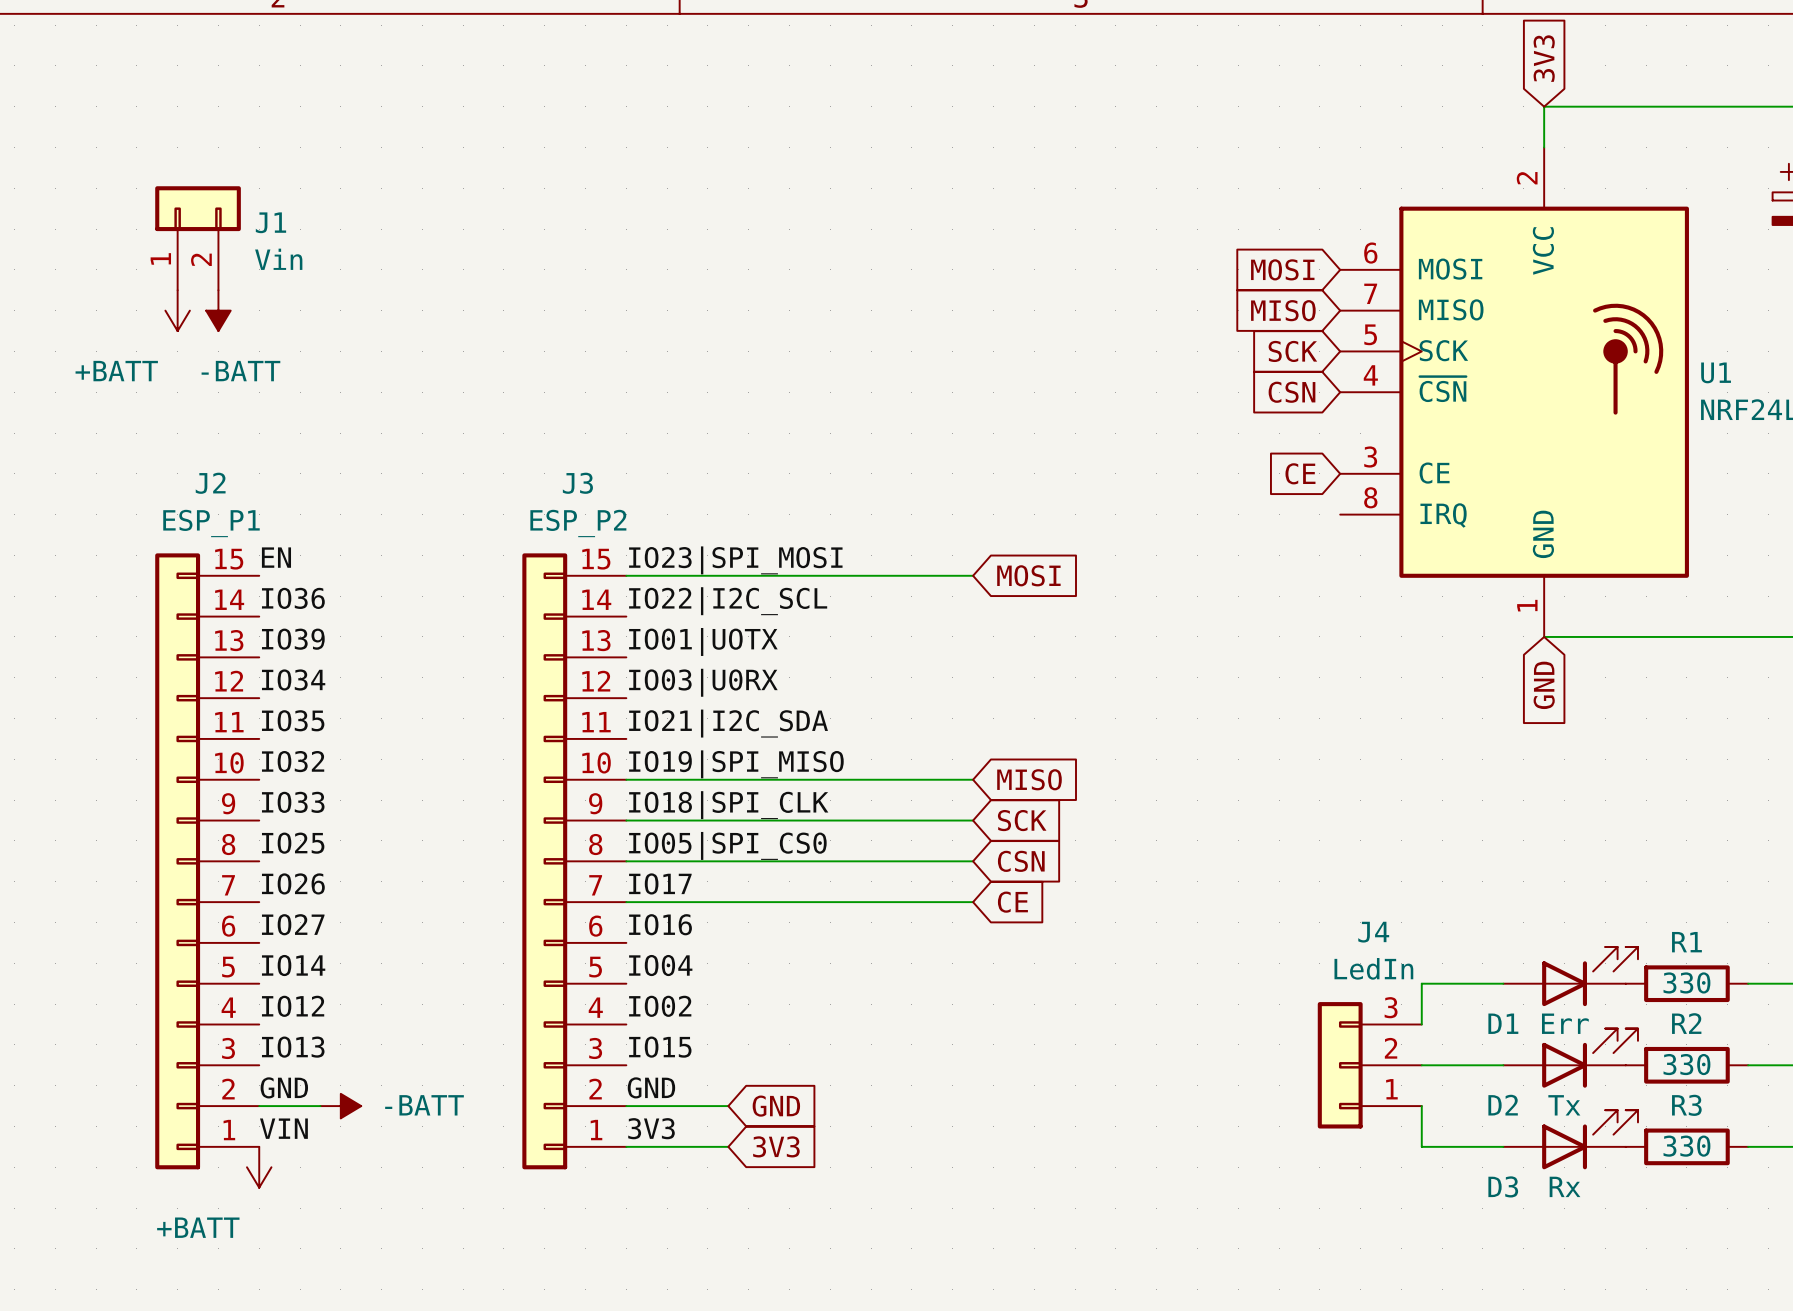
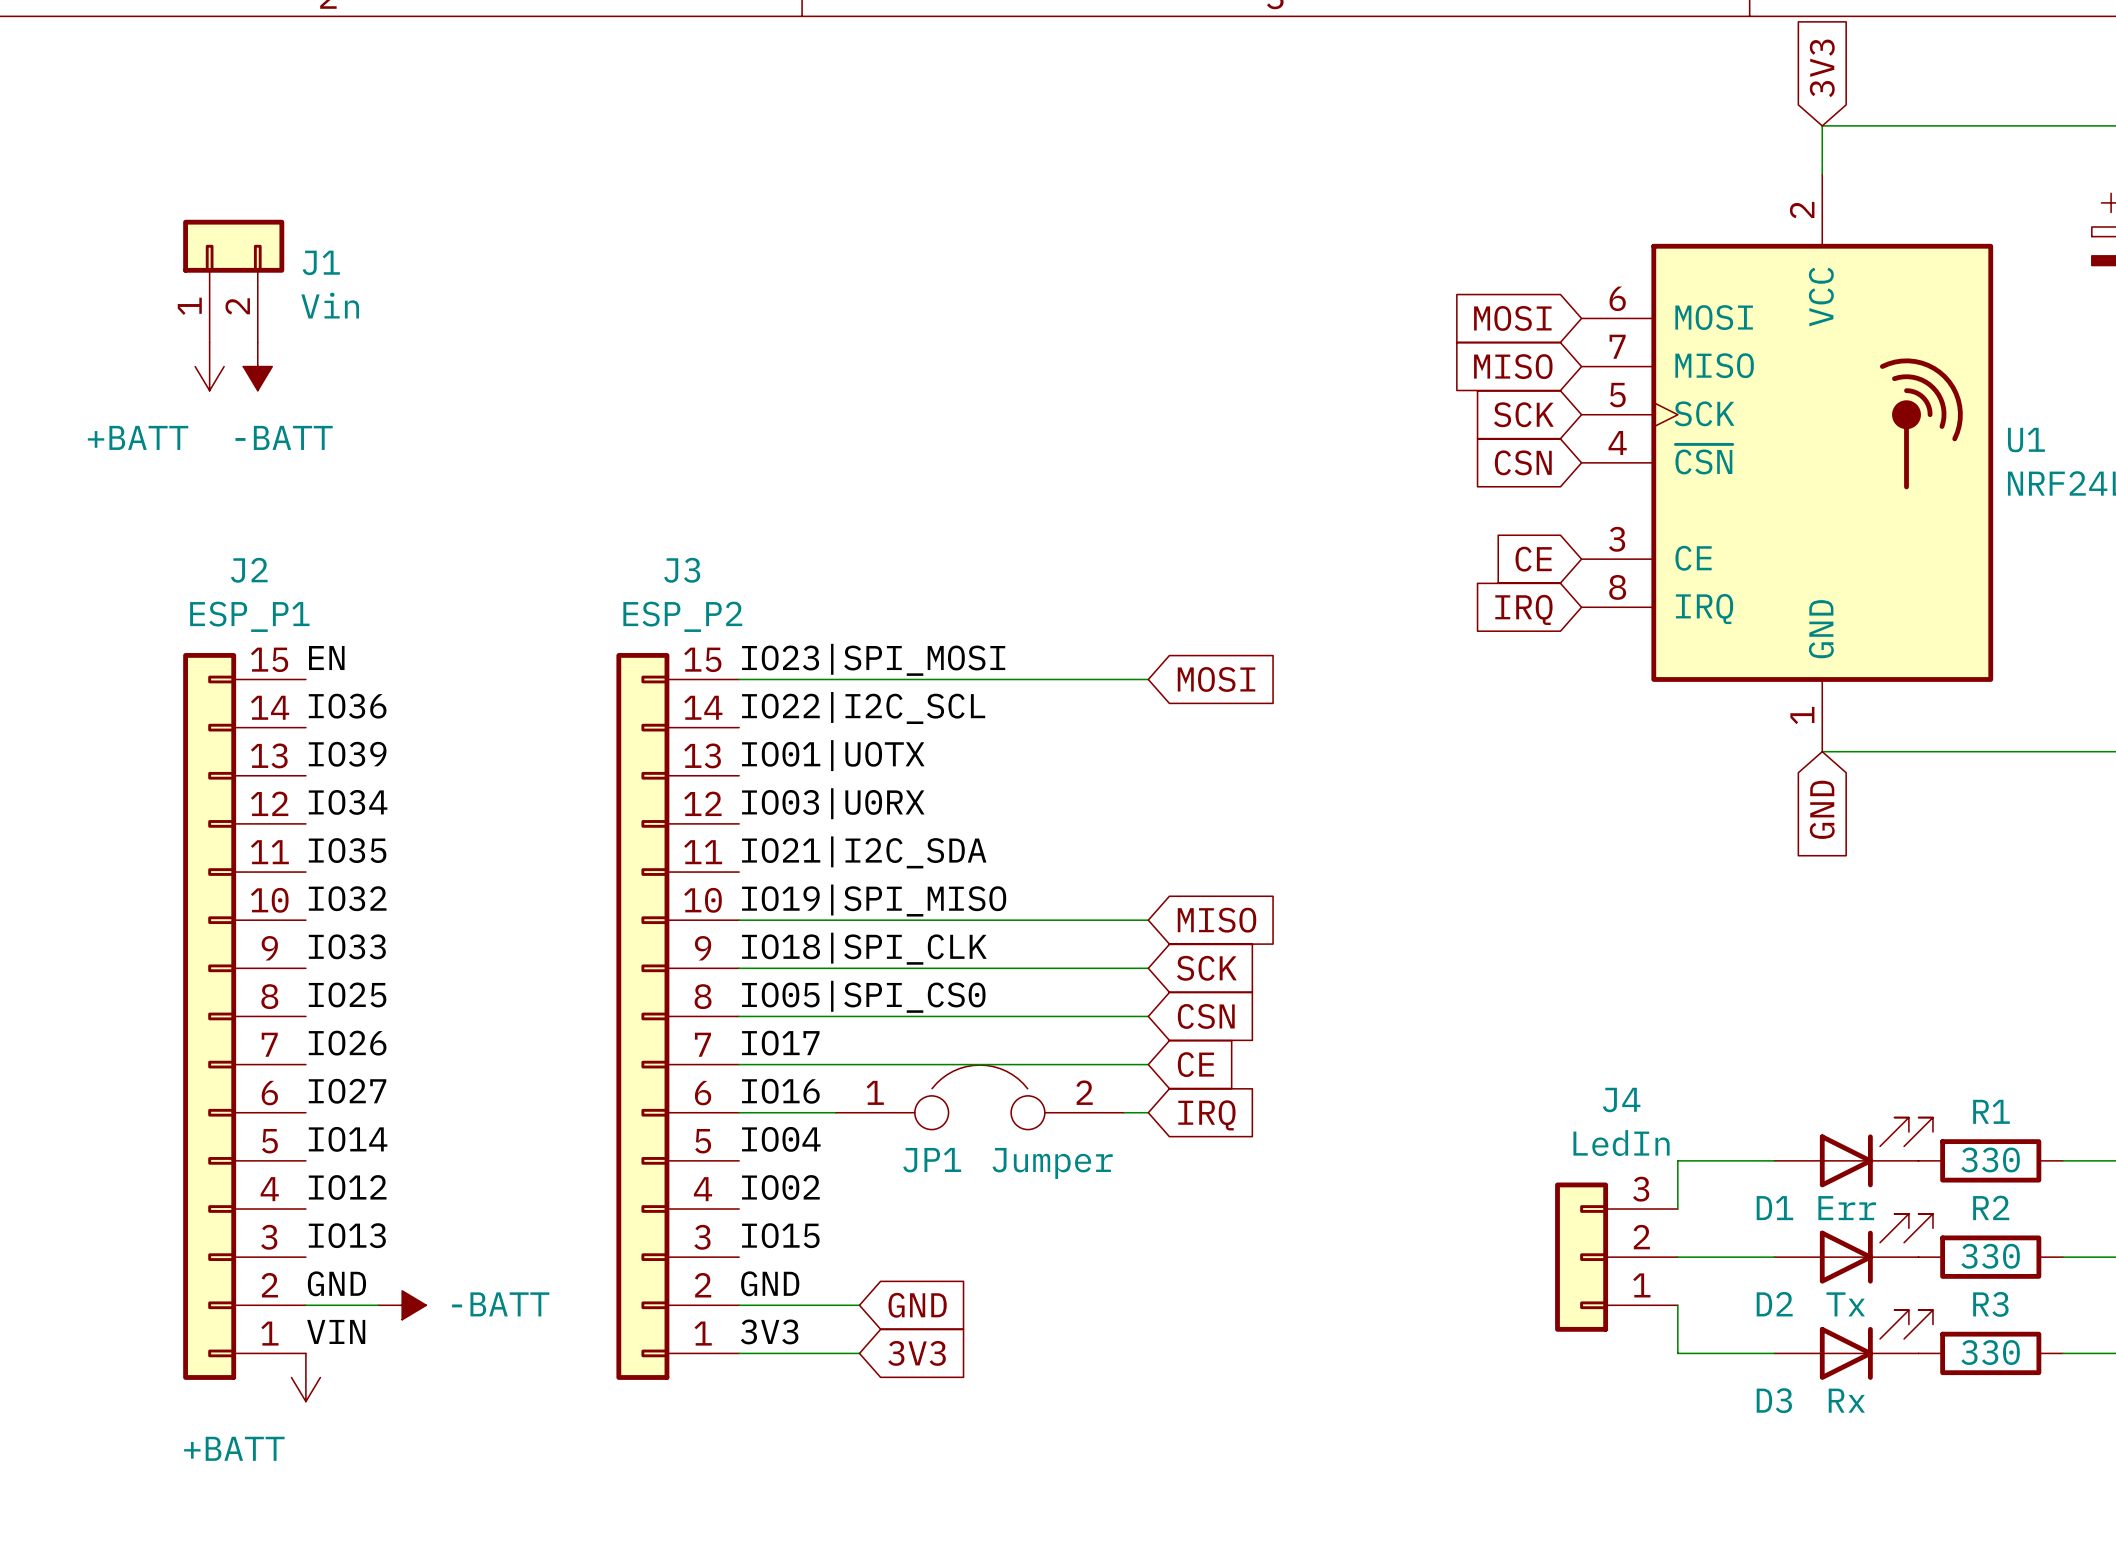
global label: none -> IRQ (1523, 609)
JP1: none -> Jumper (979, 1097)
wire: none -> (739, 1112) (835, 1112)
wire: none -> (1124, 1112) (1148, 1112)
global label: none -> IRQ (1206, 1115)

